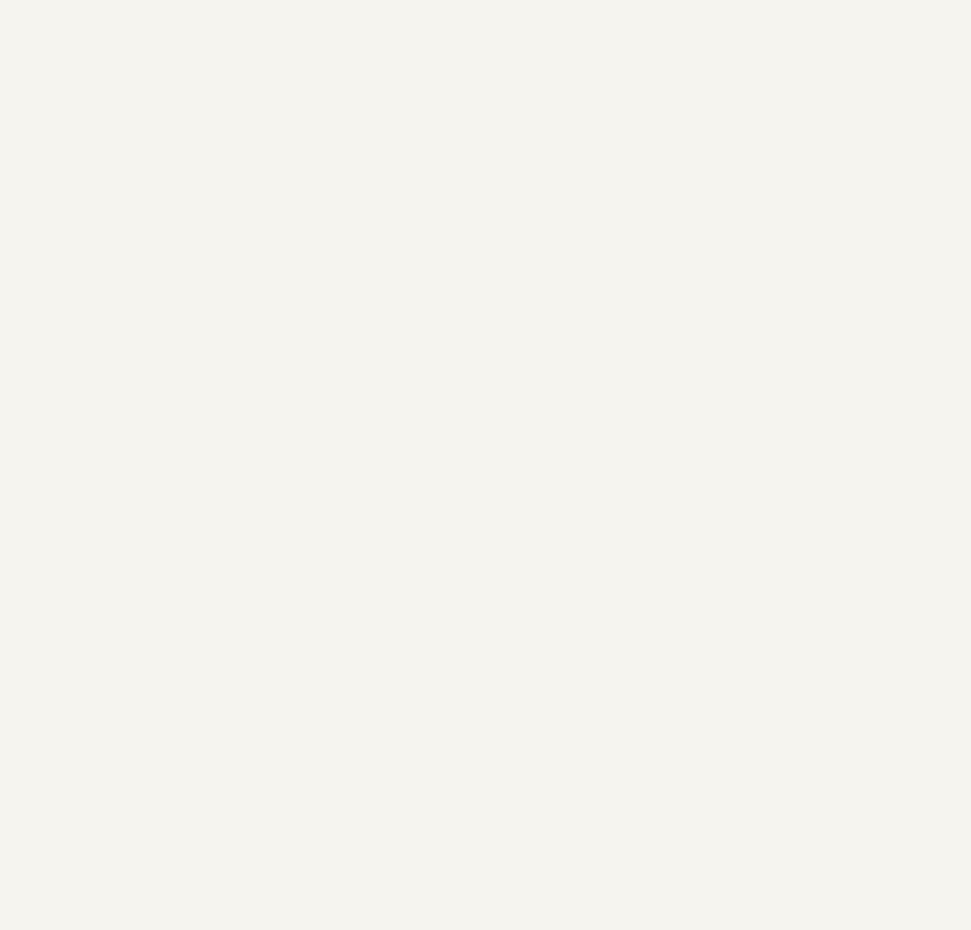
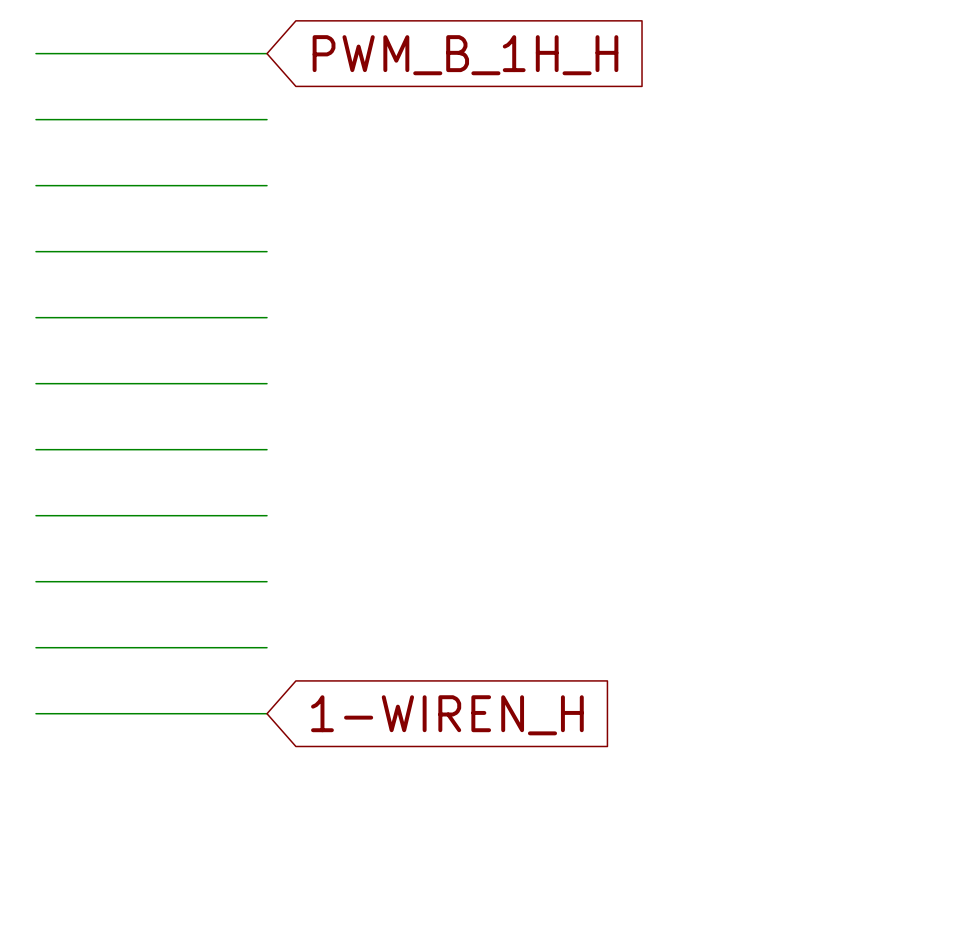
wire: none -> (35, 53) (267, 53)
global label: none -> PWM_B_1H_H (465, 55)
wire: none -> (35, 119) (267, 119)
wire: none -> (35, 185) (267, 185)
wire: none -> (35, 251) (267, 251)
wire: none -> (35, 317) (267, 317)
wire: none -> (35, 383) (267, 383)
wire: none -> (35, 449) (267, 449)
wire: none -> (35, 515) (267, 515)
wire: none -> (35, 581) (267, 581)
wire: none -> (35, 647) (267, 647)
wire: none -> (35, 713) (267, 713)
global label: none -> 1-WIREN_H (447, 715)

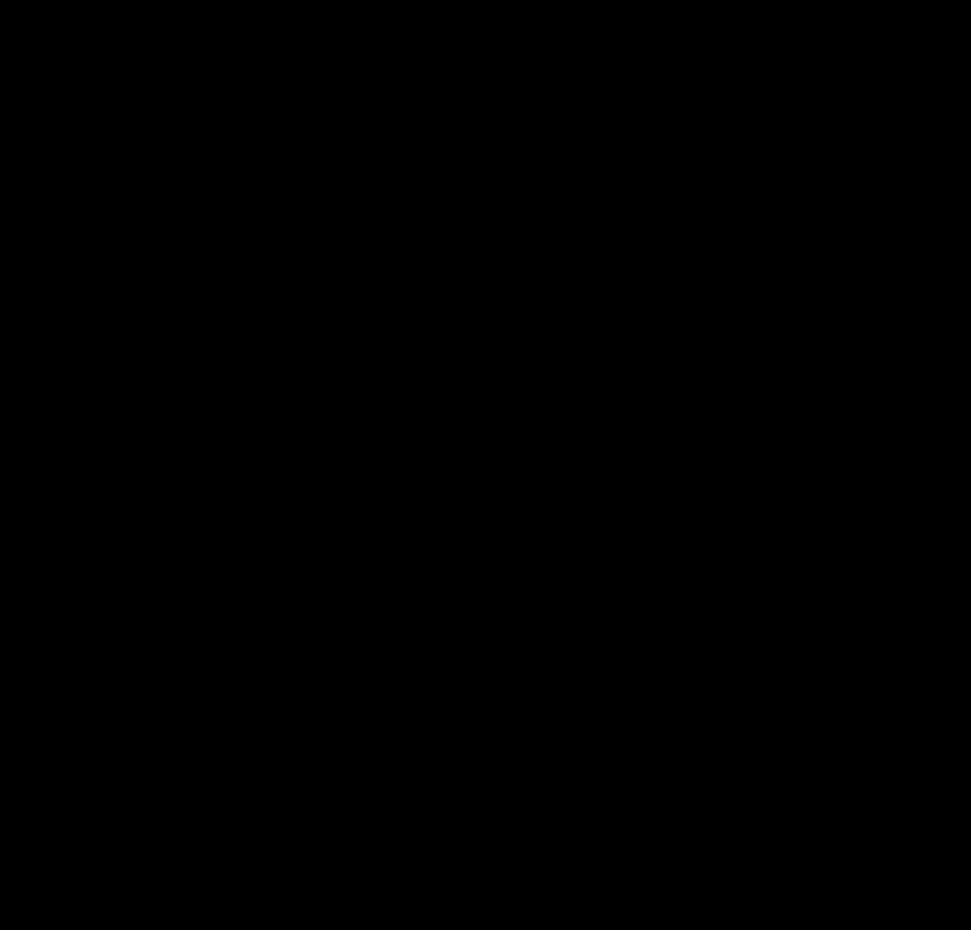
wire: (35, 53) (267, 53) -> none
global label: PWM_B_1H_H (465, 55) -> none
wire: (35, 119) (267, 119) -> none
wire: (35, 185) (267, 185) -> none
wire: (35, 251) (267, 251) -> none
wire: (35, 317) (267, 317) -> none
wire: (35, 383) (267, 383) -> none
wire: (35, 449) (267, 449) -> none
wire: (35, 515) (267, 515) -> none
wire: (35, 581) (267, 581) -> none
wire: (35, 647) (267, 647) -> none
wire: (35, 713) (267, 713) -> none
global label: 1-WIREN_H (447, 715) -> none

